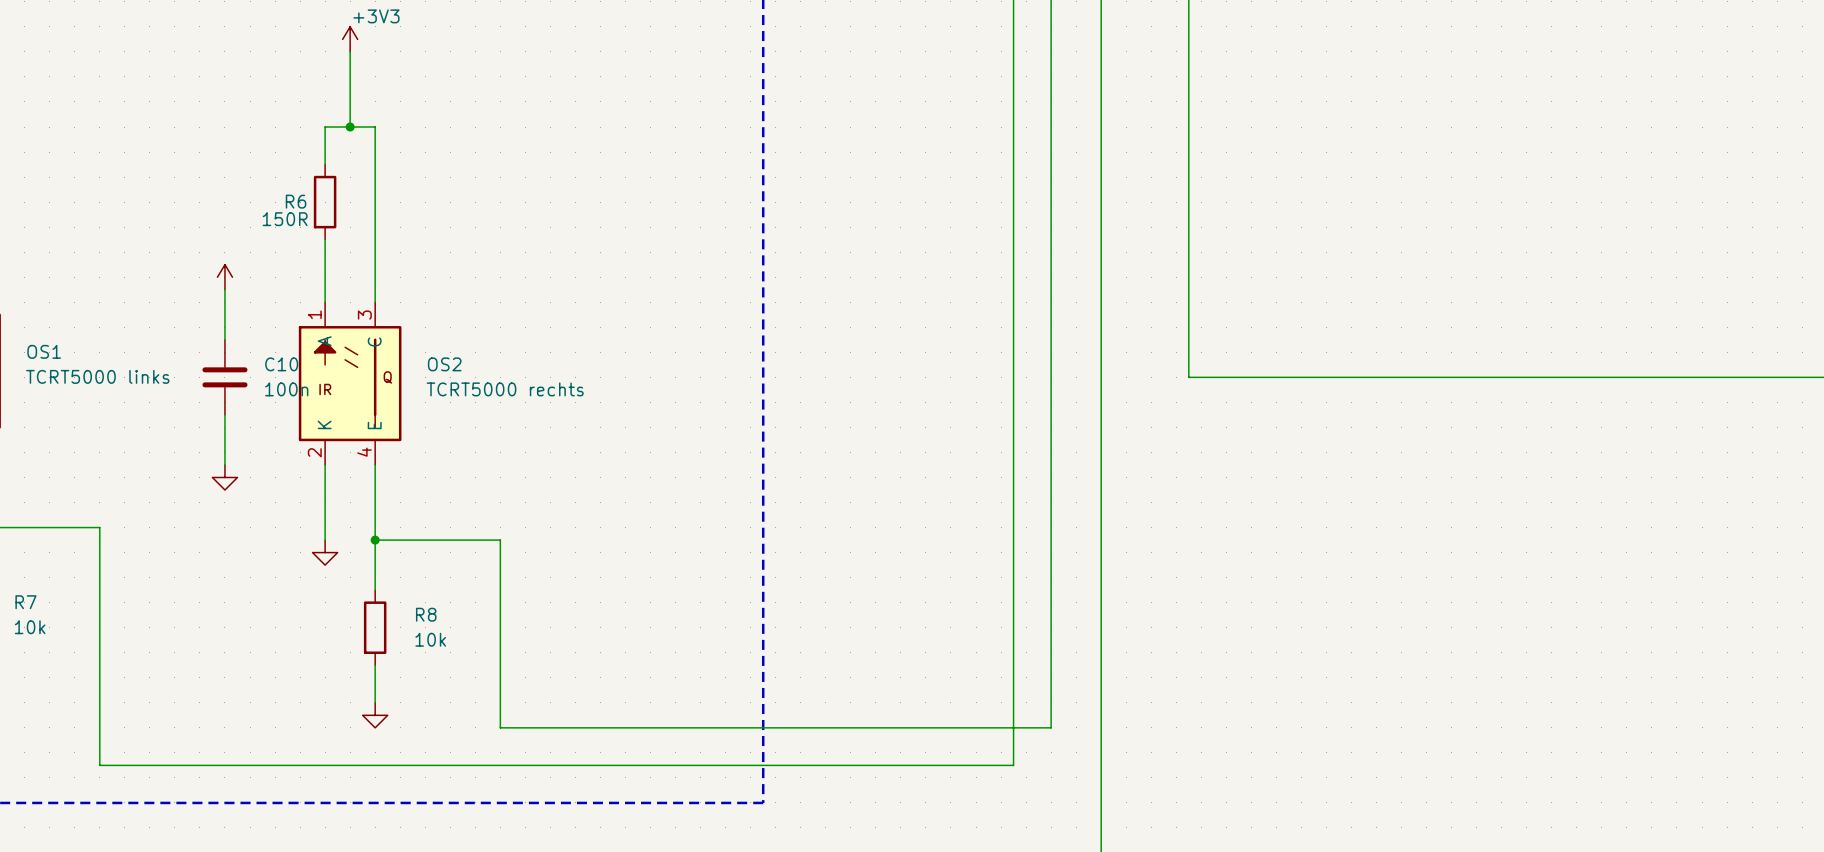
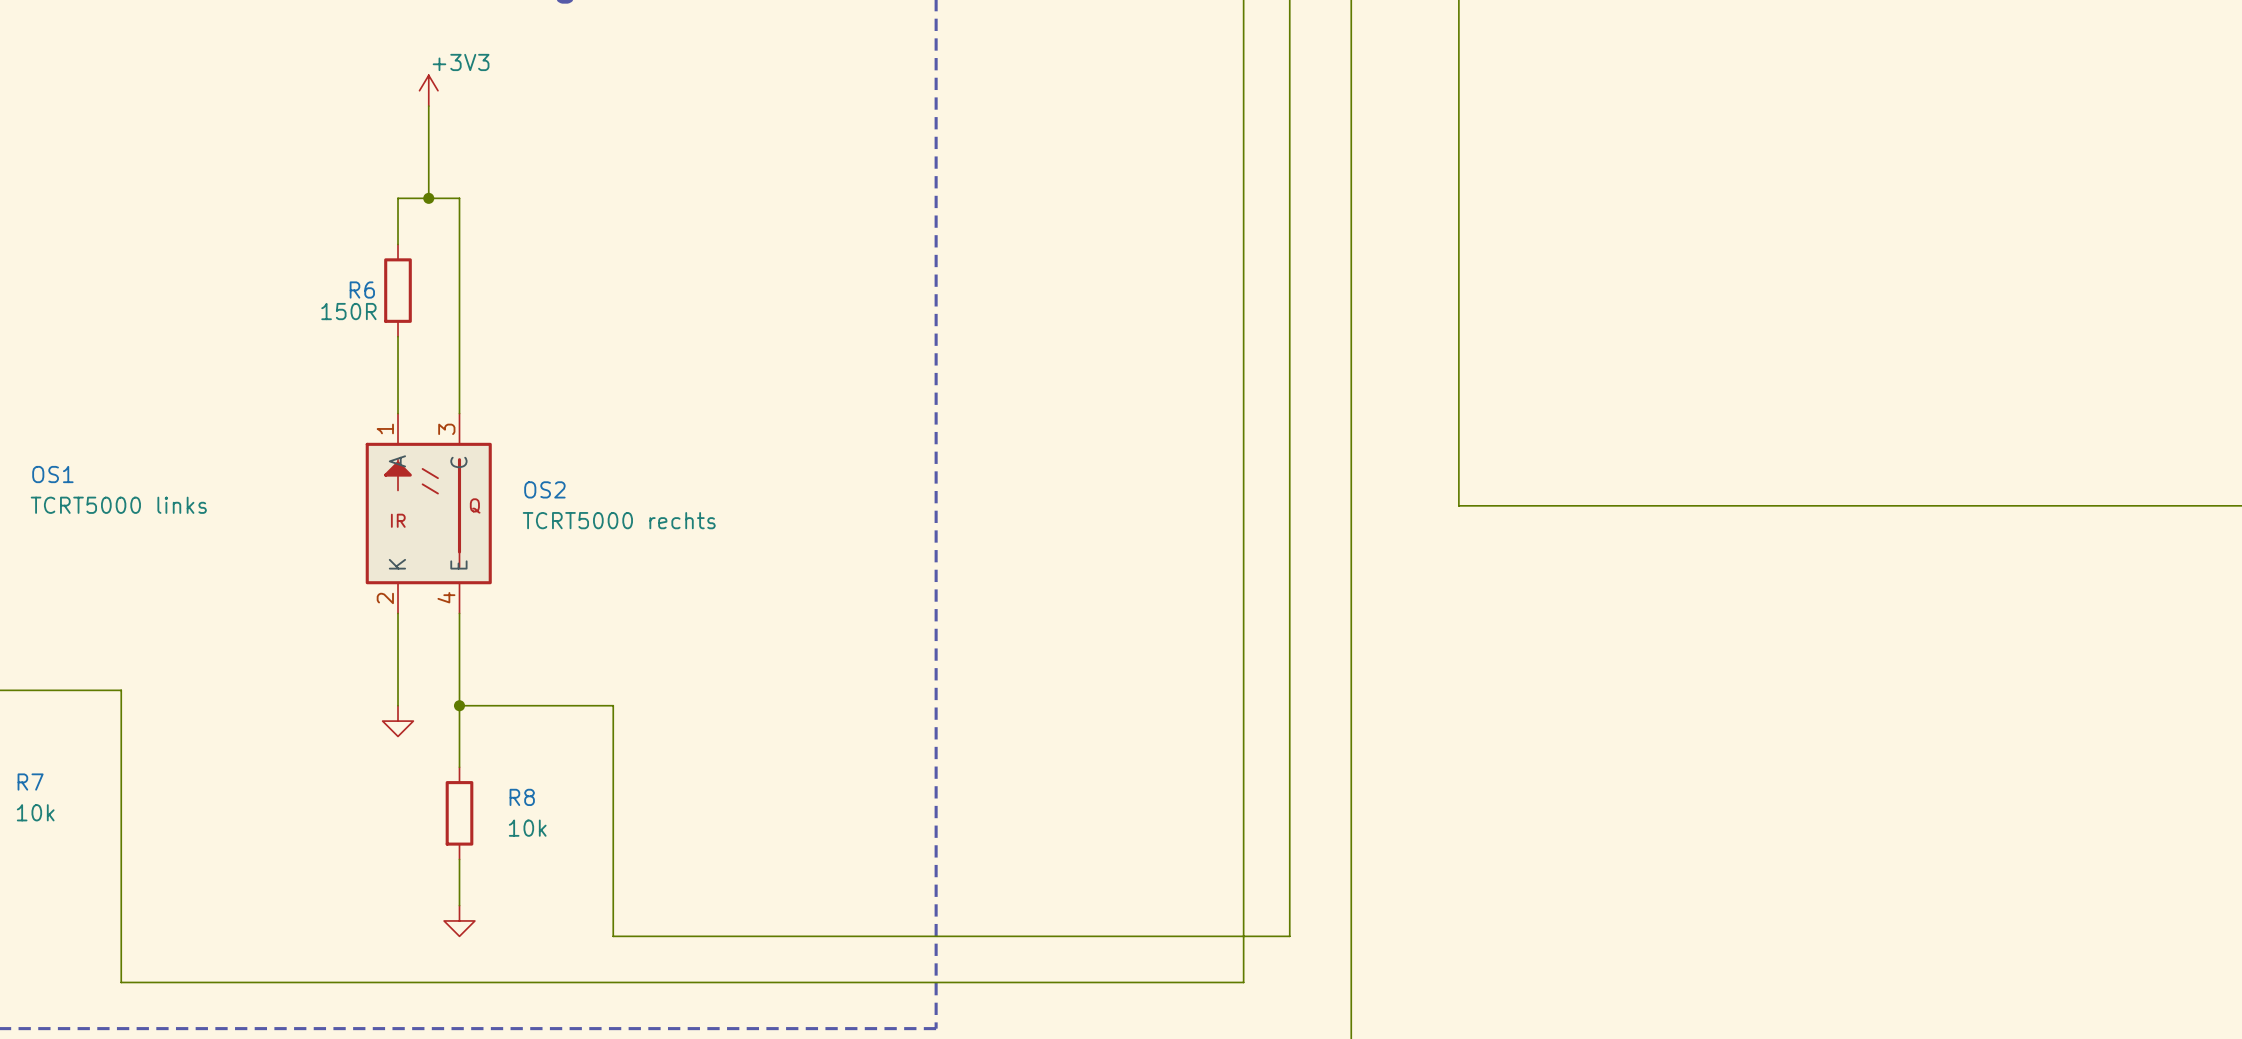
power symbol: (224, 277) -> none
wire: (224, 289) (224, 339) -> none
C10: 100n (224, 377) -> none
wire: (224, 414) (224, 464) -> none
power symbol: (224, 477) -> none

